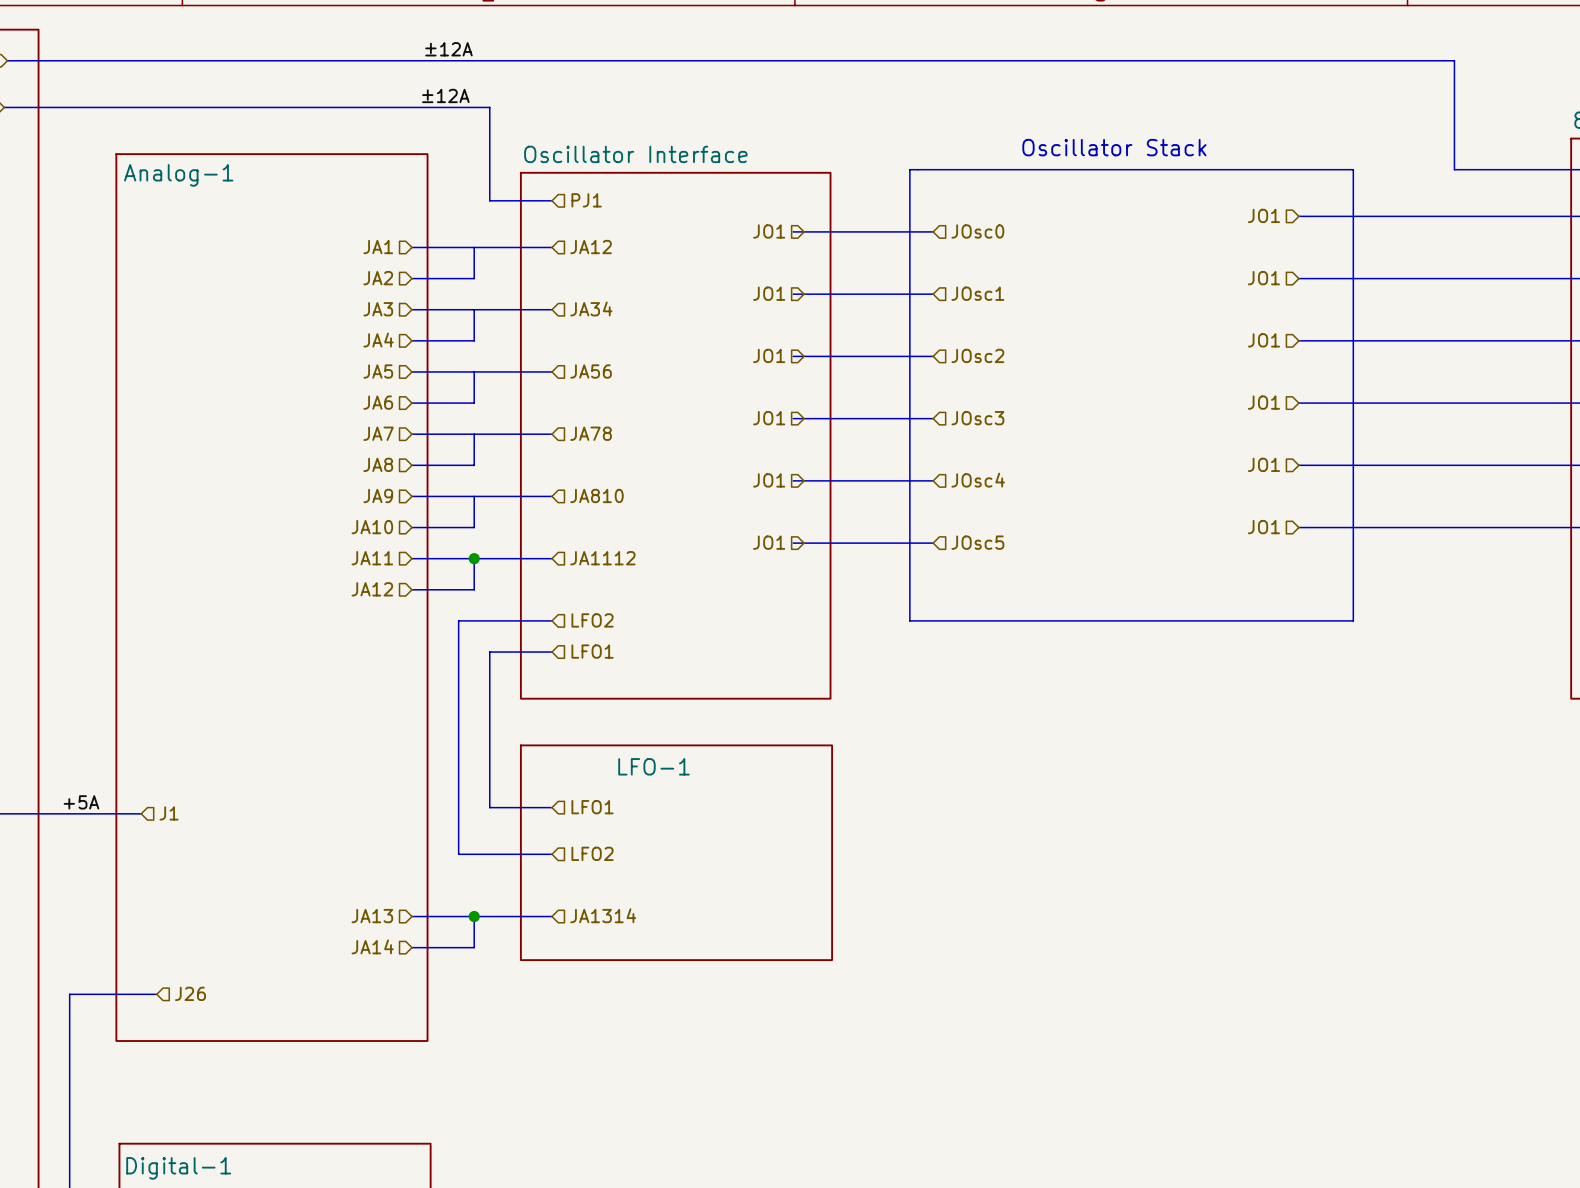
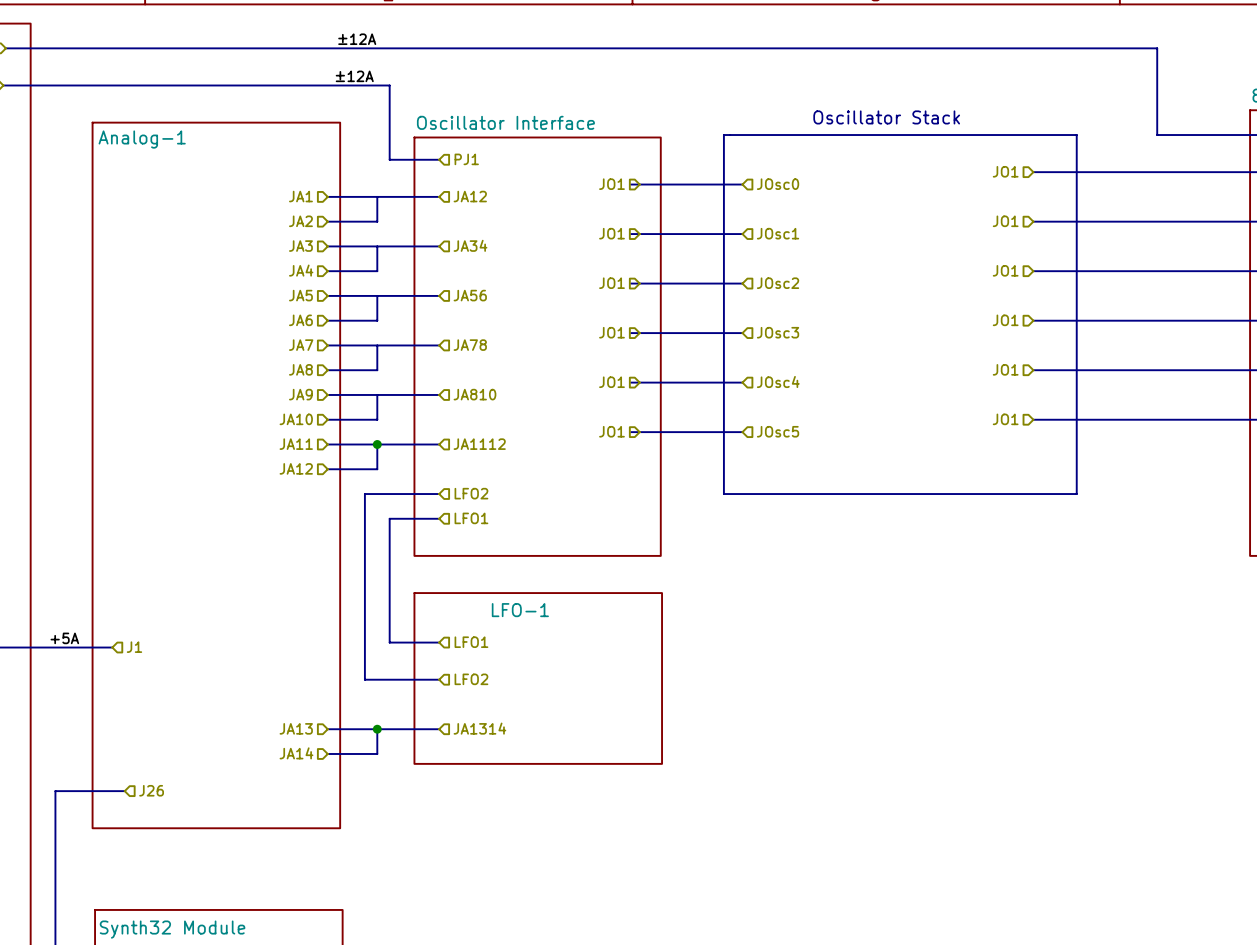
sheet Digital-1 name: Digital-1 (178, 1168) -> Synth32 Module (172, 929)

